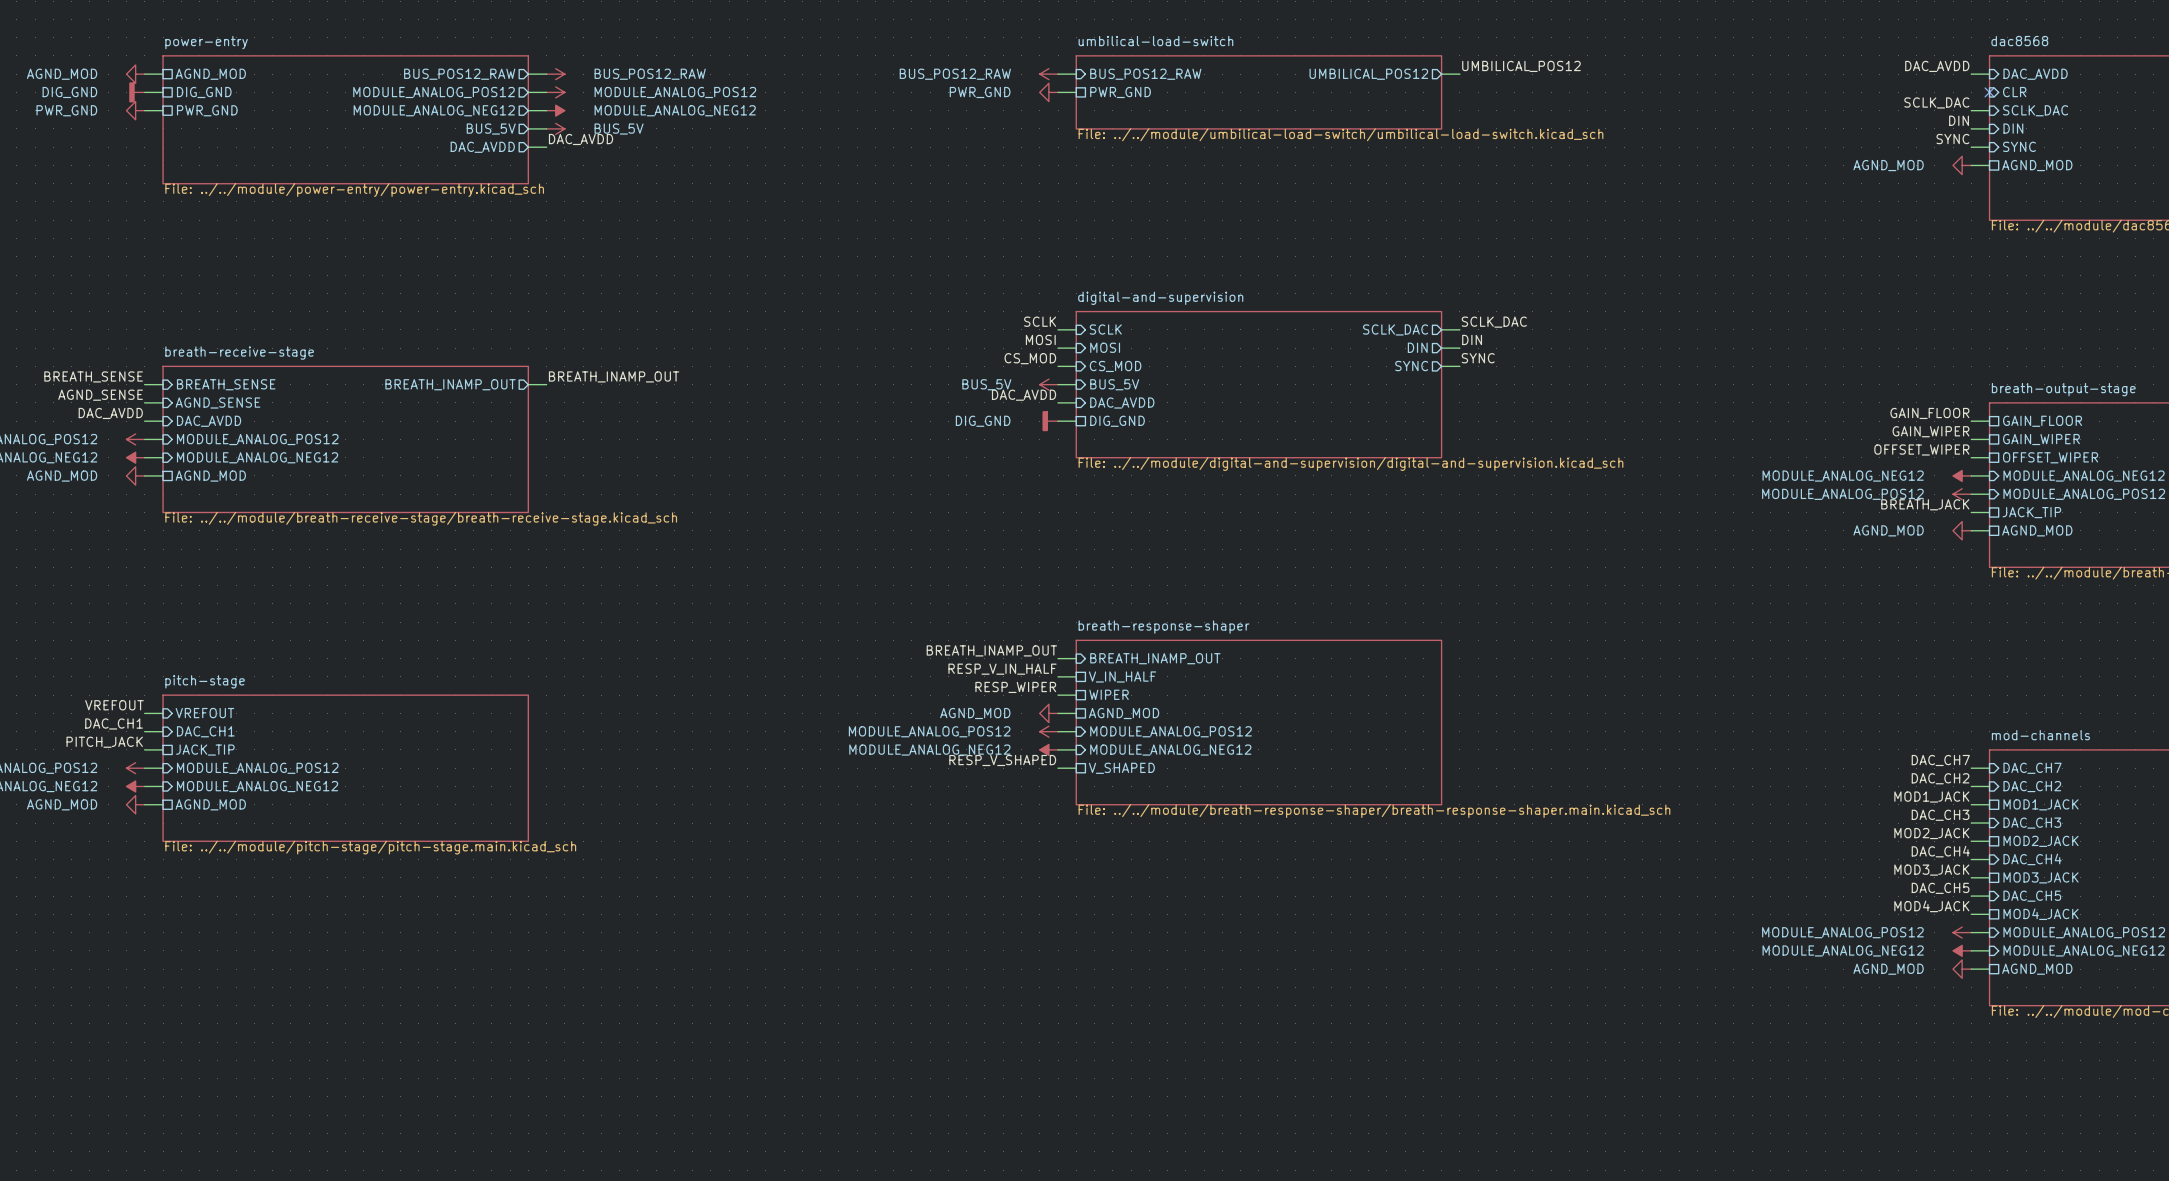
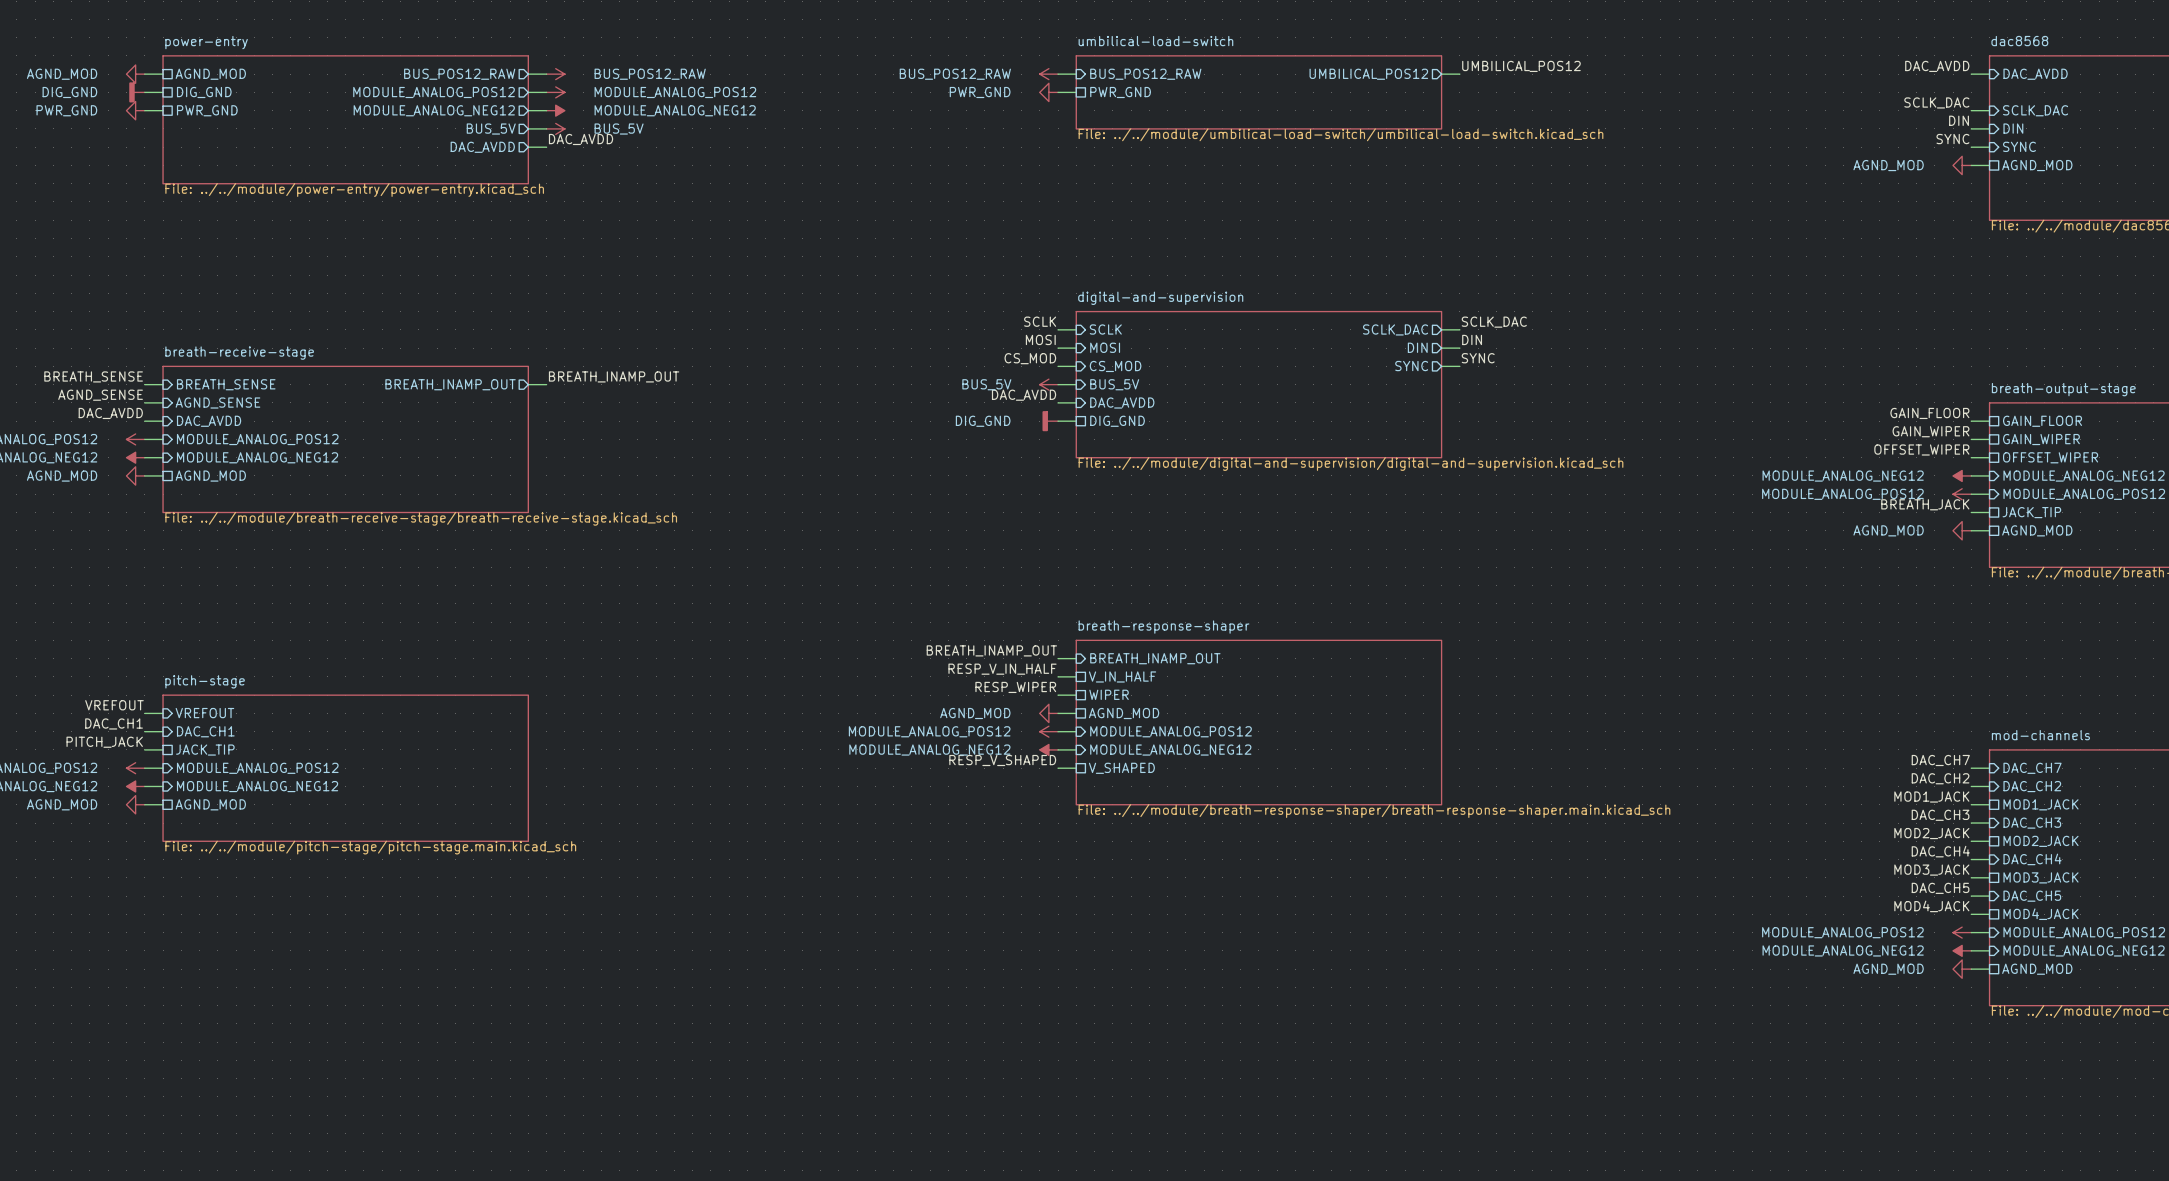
no-connect mark: (1989, 92) -> none
sheet pin: CLR (2014, 92) -> none

